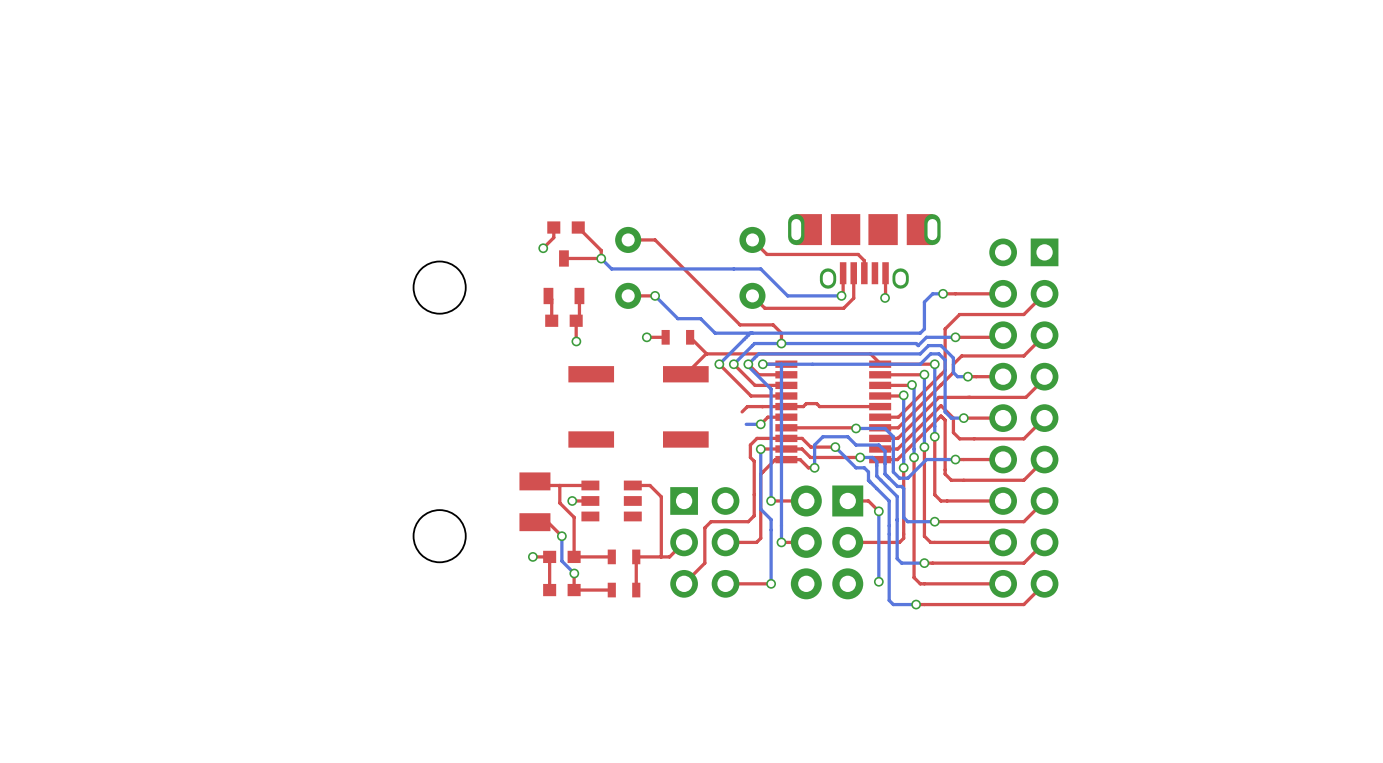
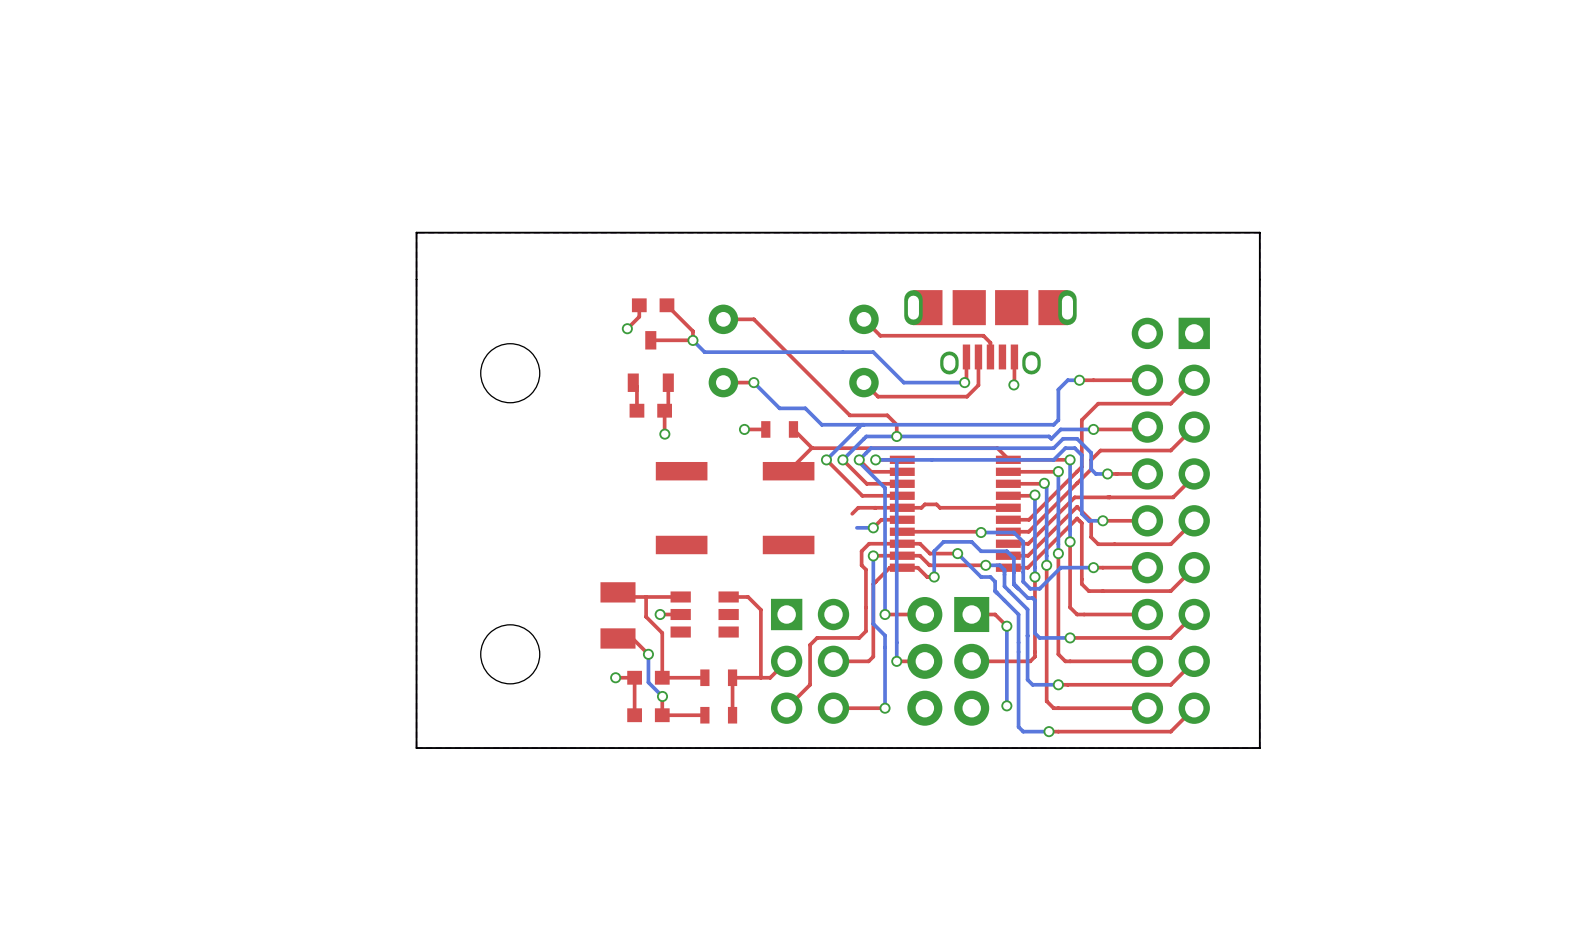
board edge: none -> (1259, 232) (416, 232) (416, 748) (1259, 748) (1259, 232)

